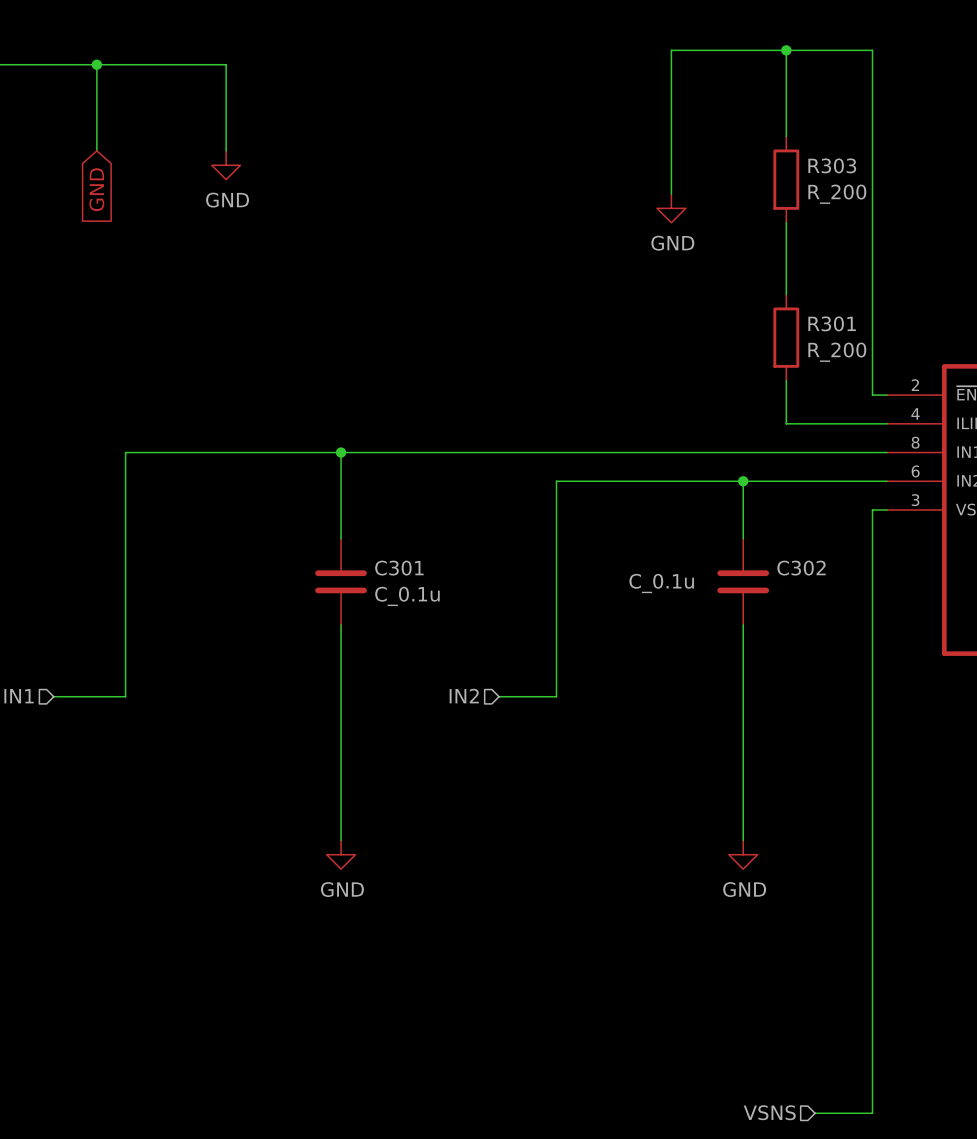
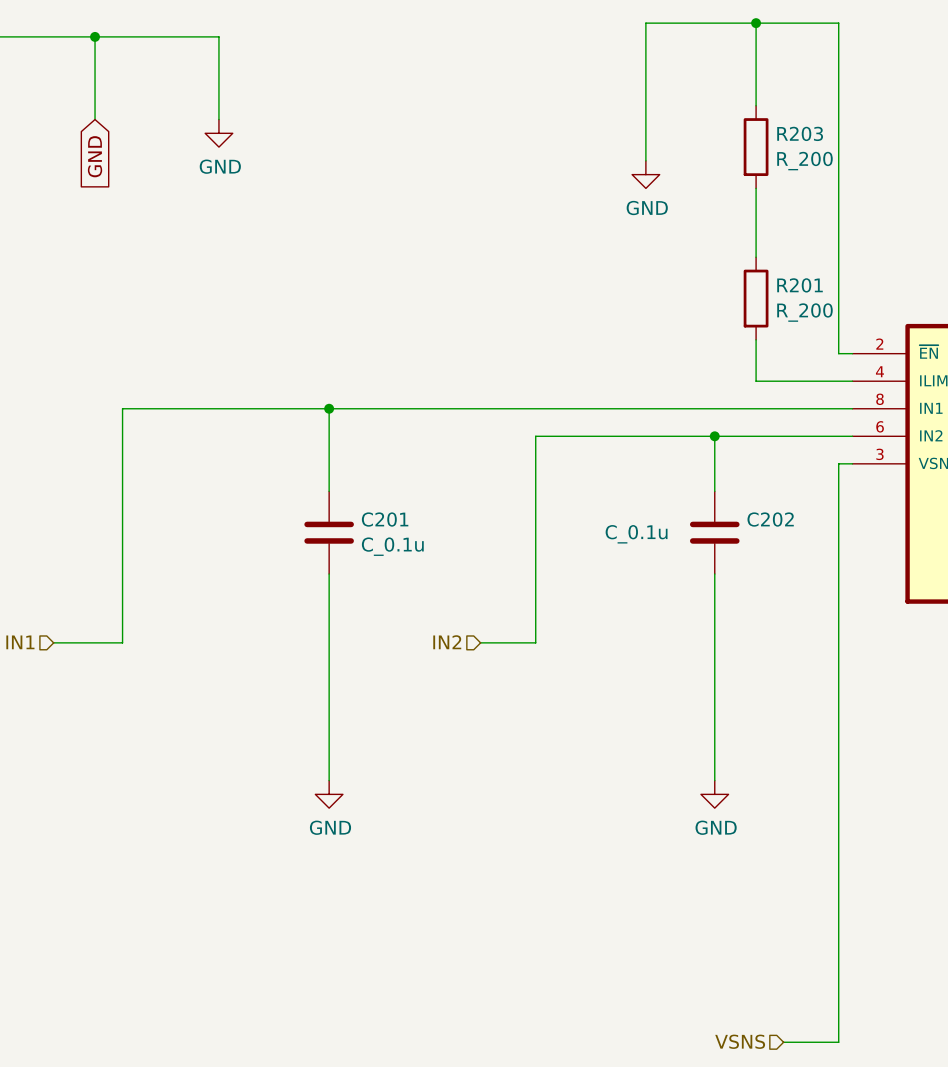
R303 name: R303 (832, 165) -> R203 (800, 133)
R301 name: R301 (832, 323) -> R201 (800, 285)
C301 name: C301 (399, 568) -> C201 (385, 519)
C302 name: C302 (801, 568) -> C202 (770, 519)

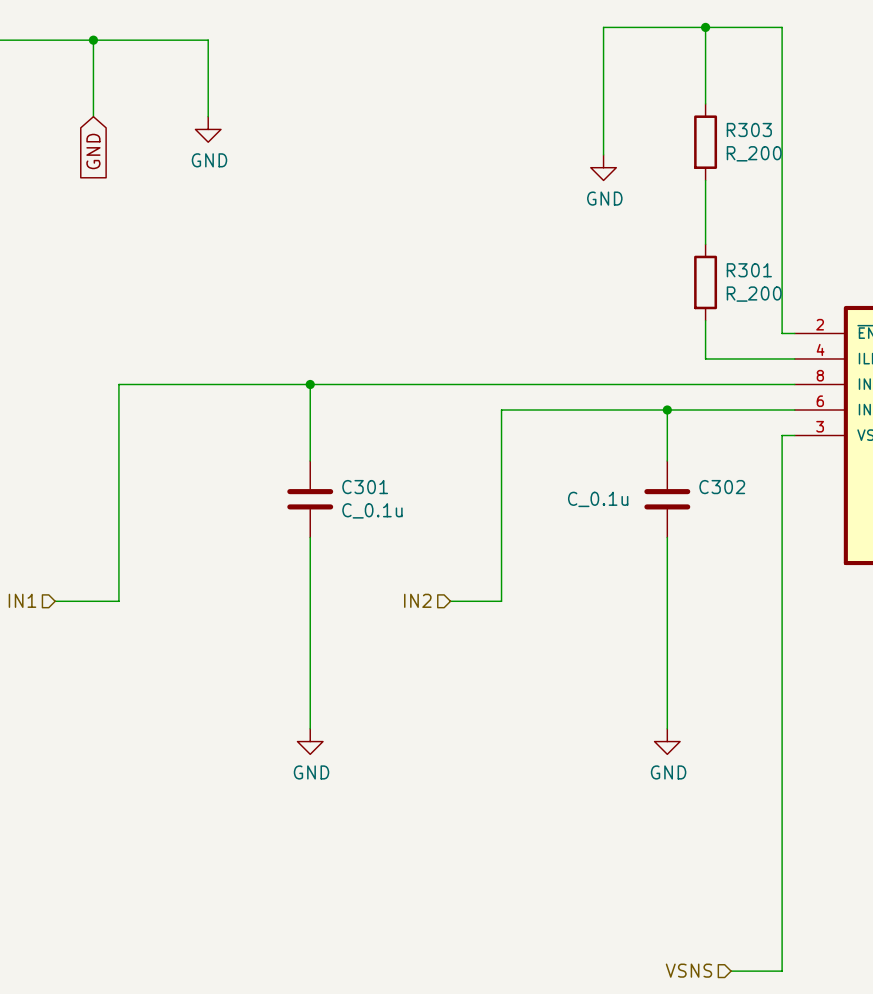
R203 name: R203 (800, 133) -> R303 (749, 129)
R201 name: R201 (800, 285) -> R301 (749, 270)
C201 name: C201 (385, 519) -> C301 (365, 487)
C202 name: C202 (770, 519) -> C302 (722, 487)

